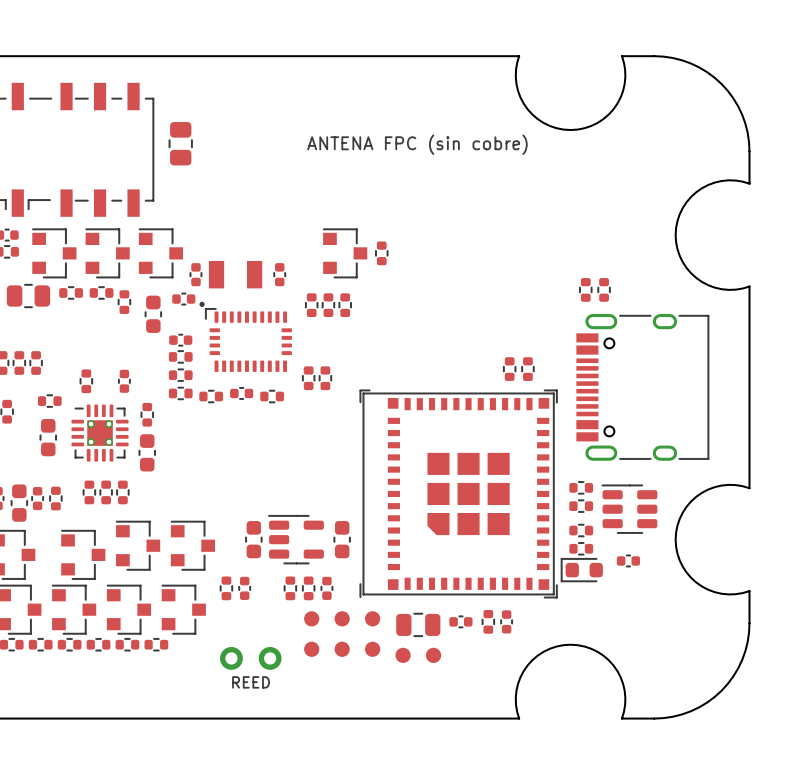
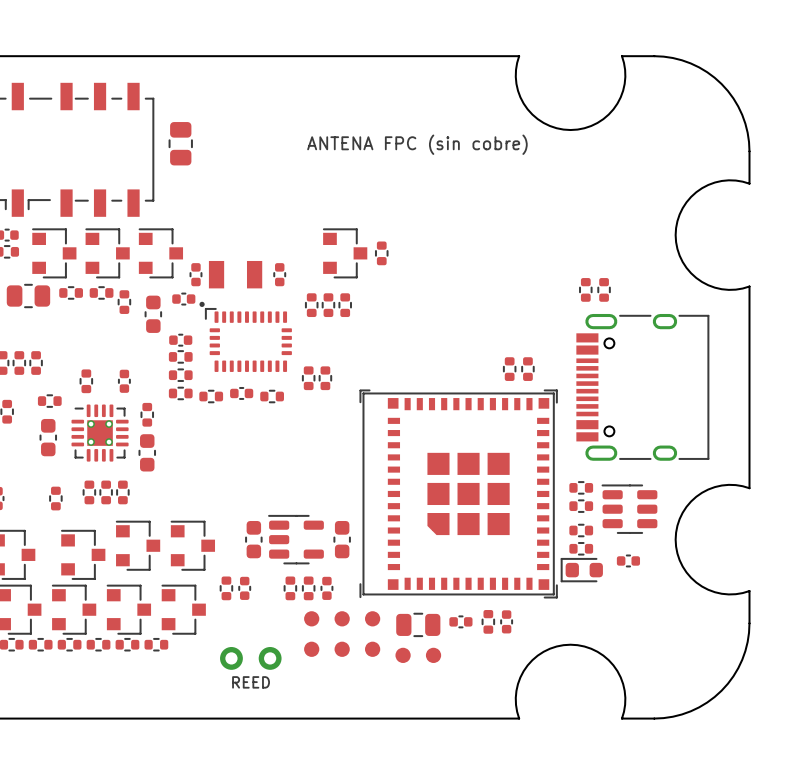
part: (37, 498) -> none
part: (19, 503) -> none

